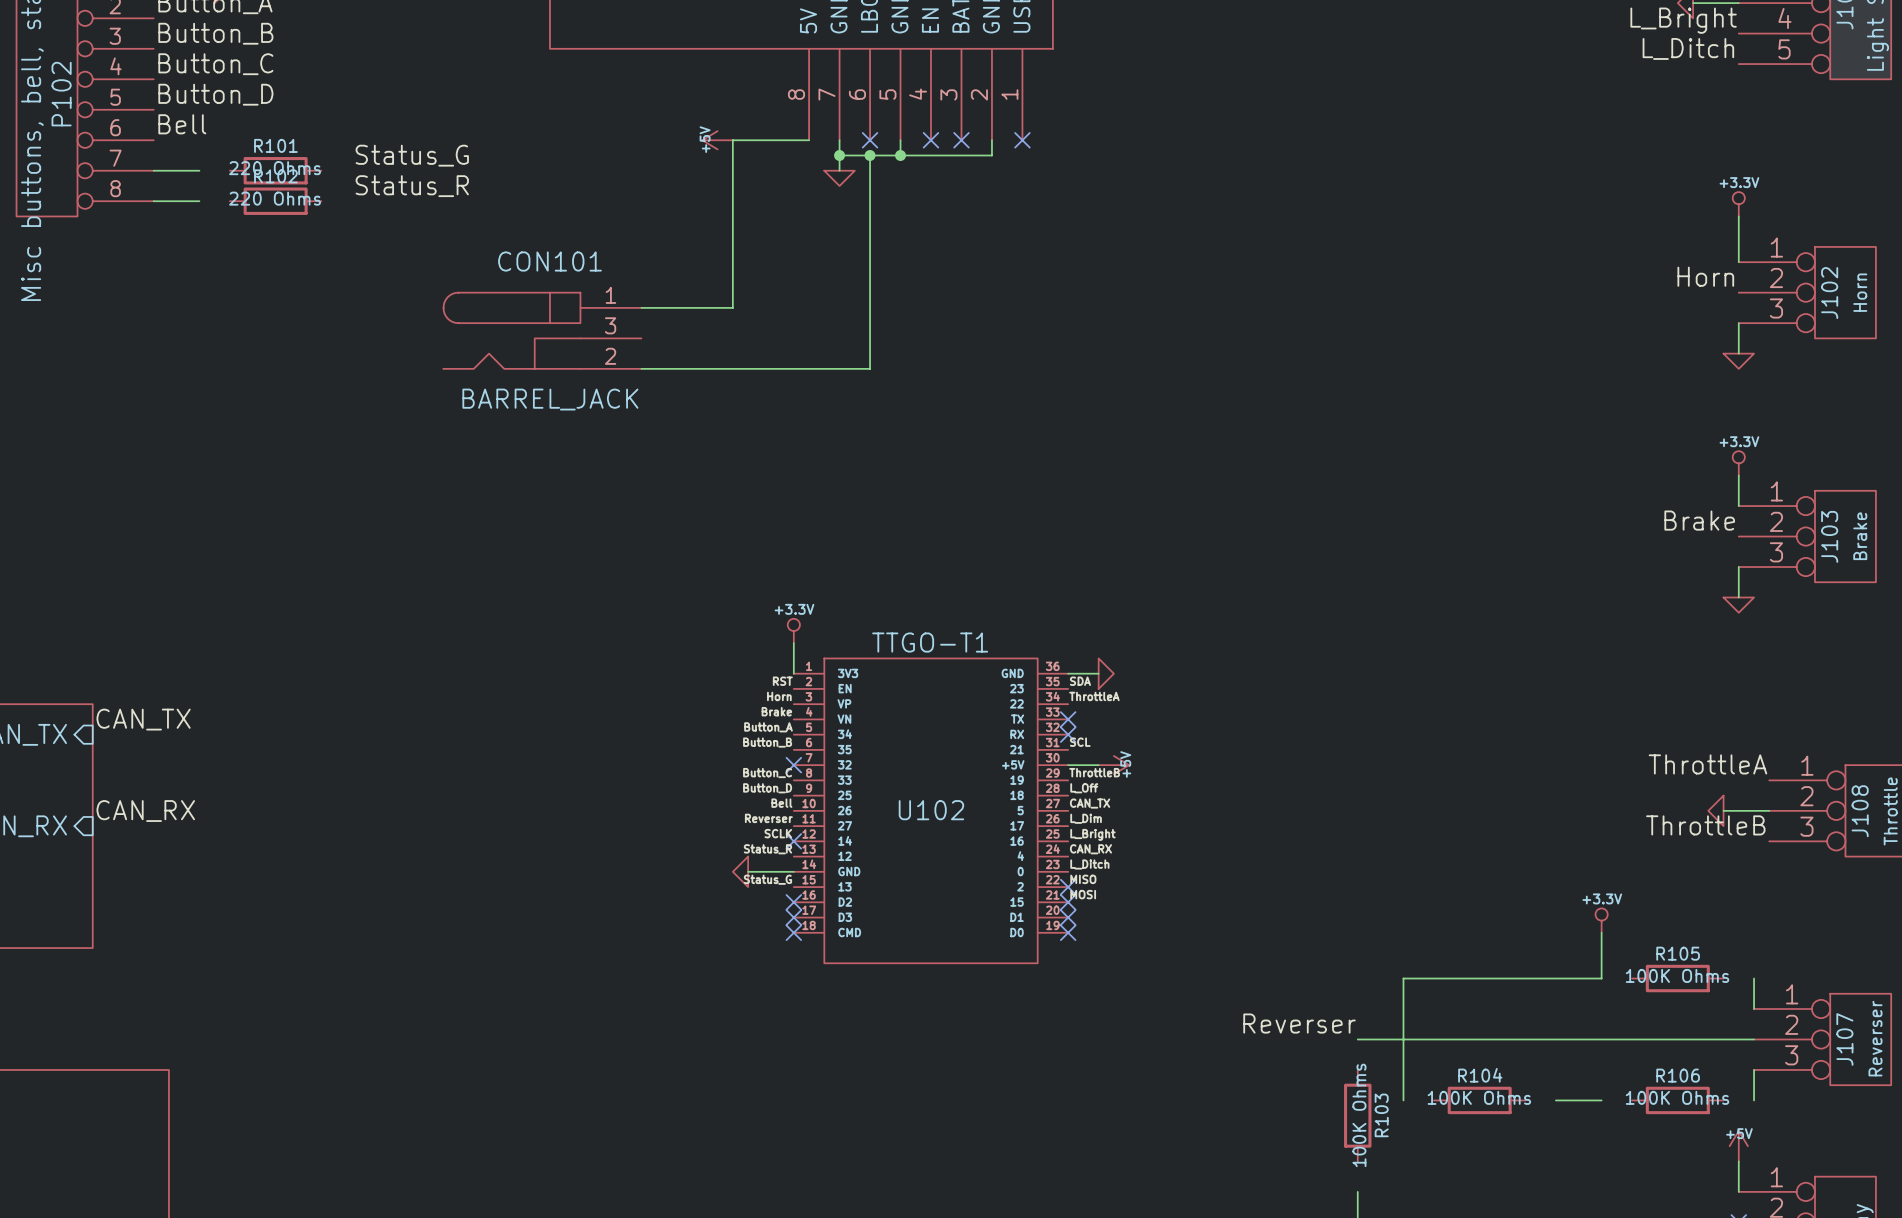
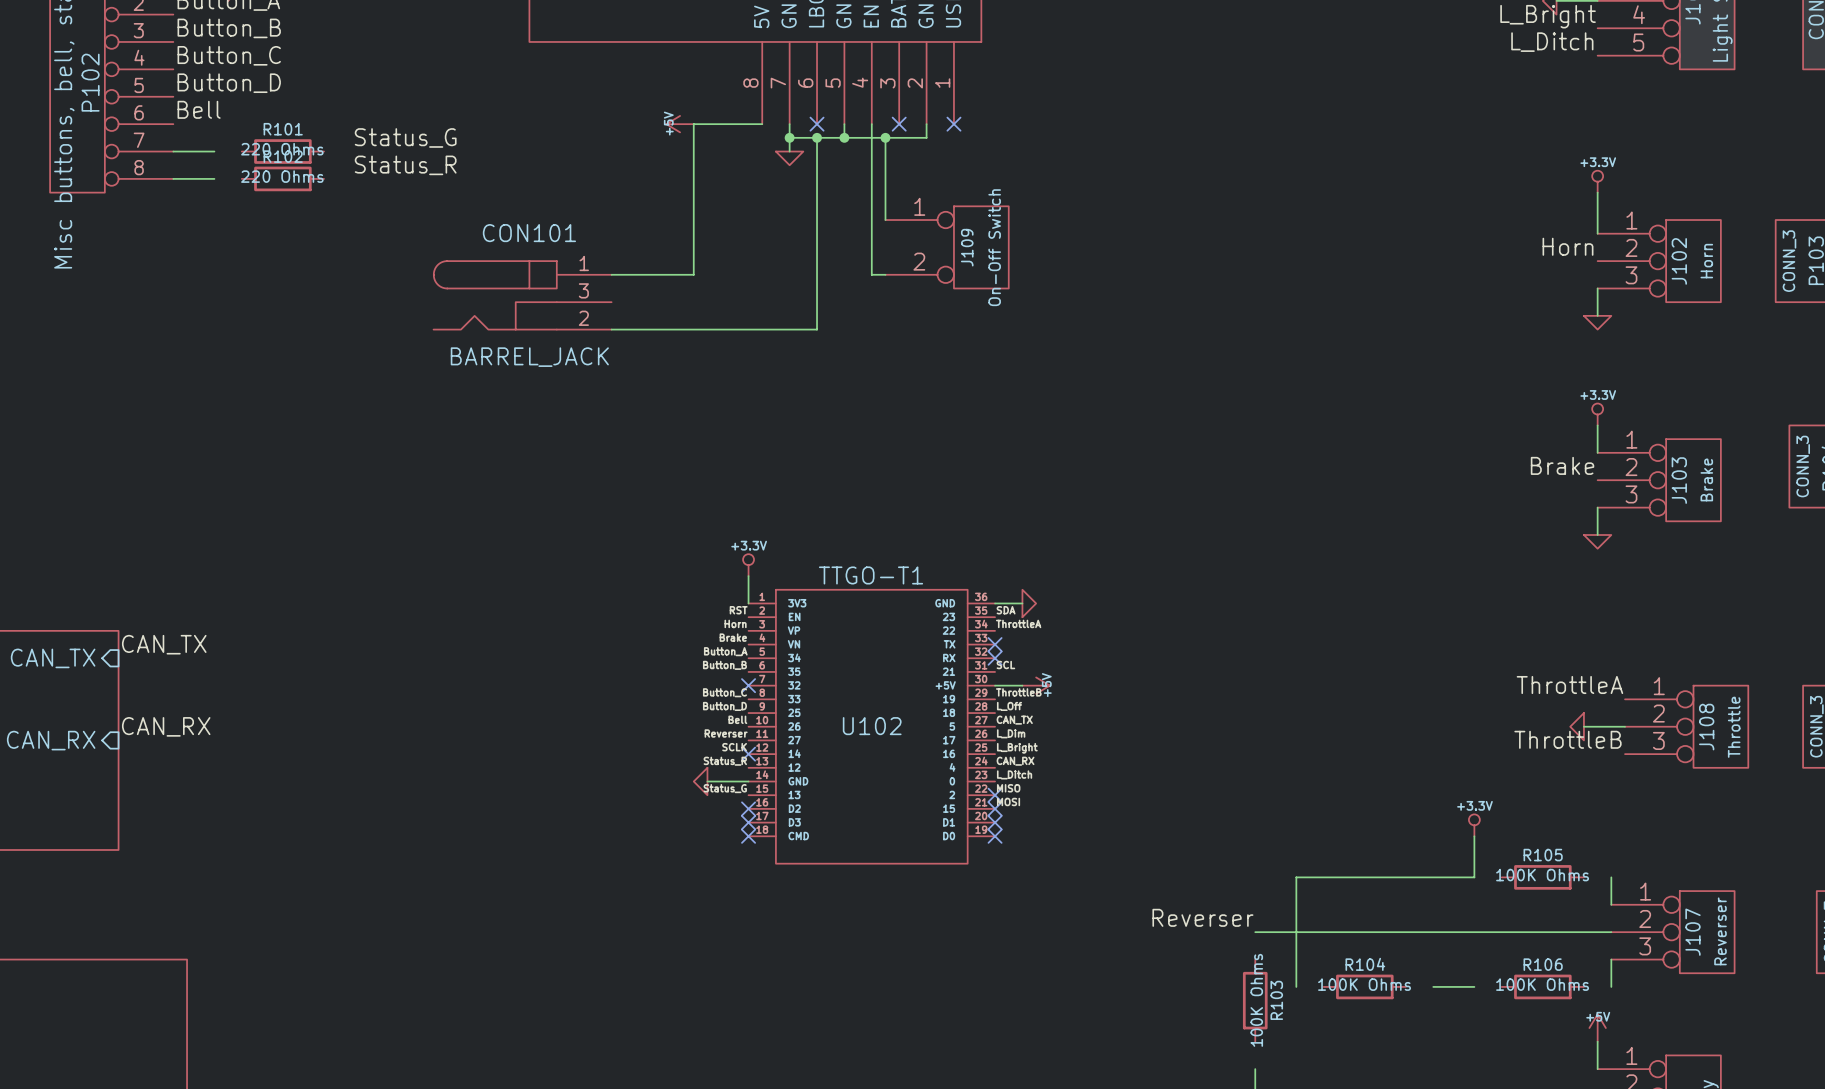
wire: none -> (871, 124) (871, 274) (885, 274)
no-connect mark: (931, 140) -> none
wire: none -> (885, 137) (885, 220)
junction: none -> (885, 137)
J109: none -> On-Off Switch (947, 247)

